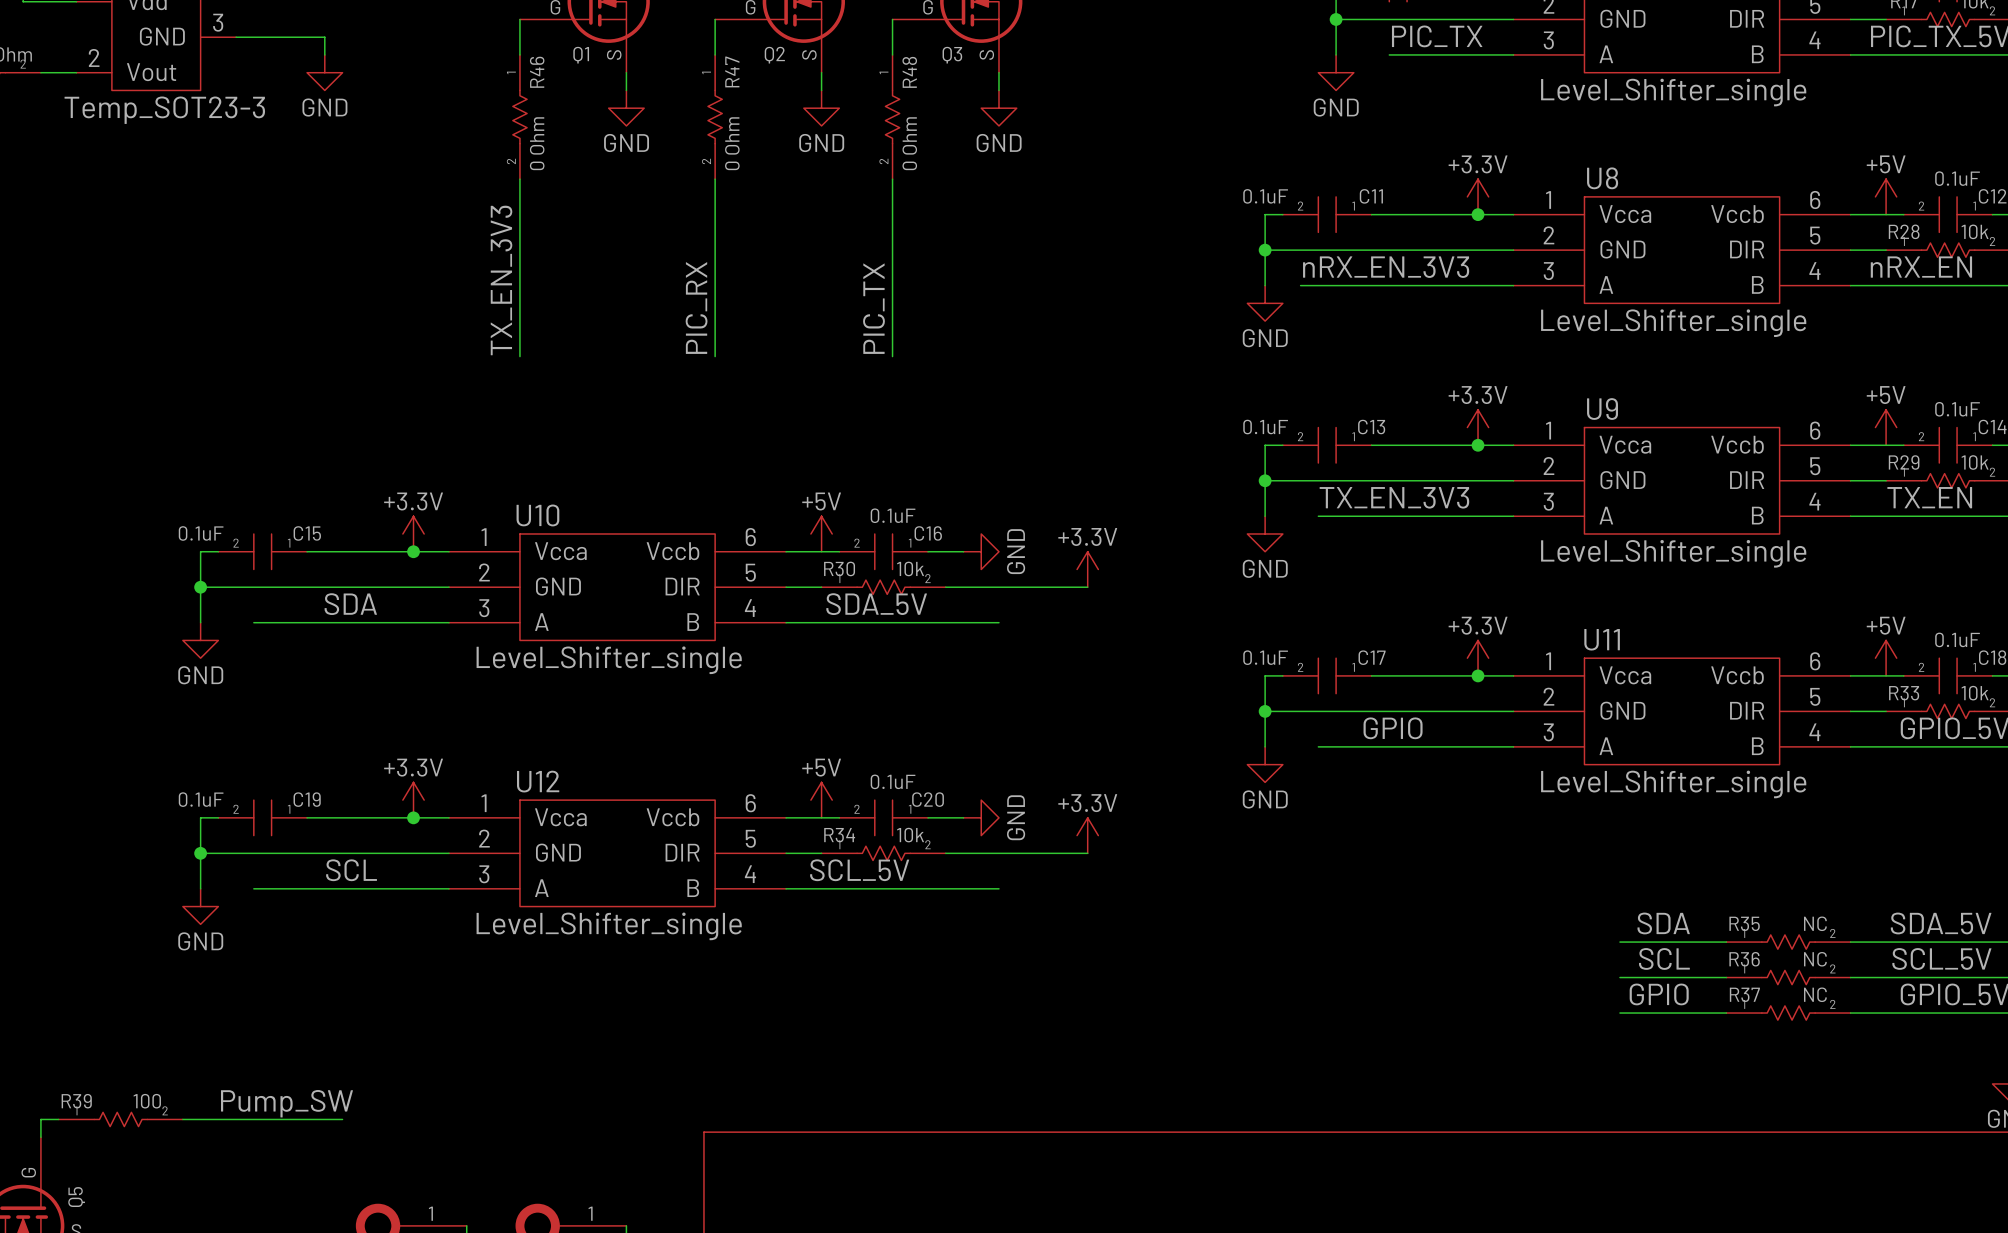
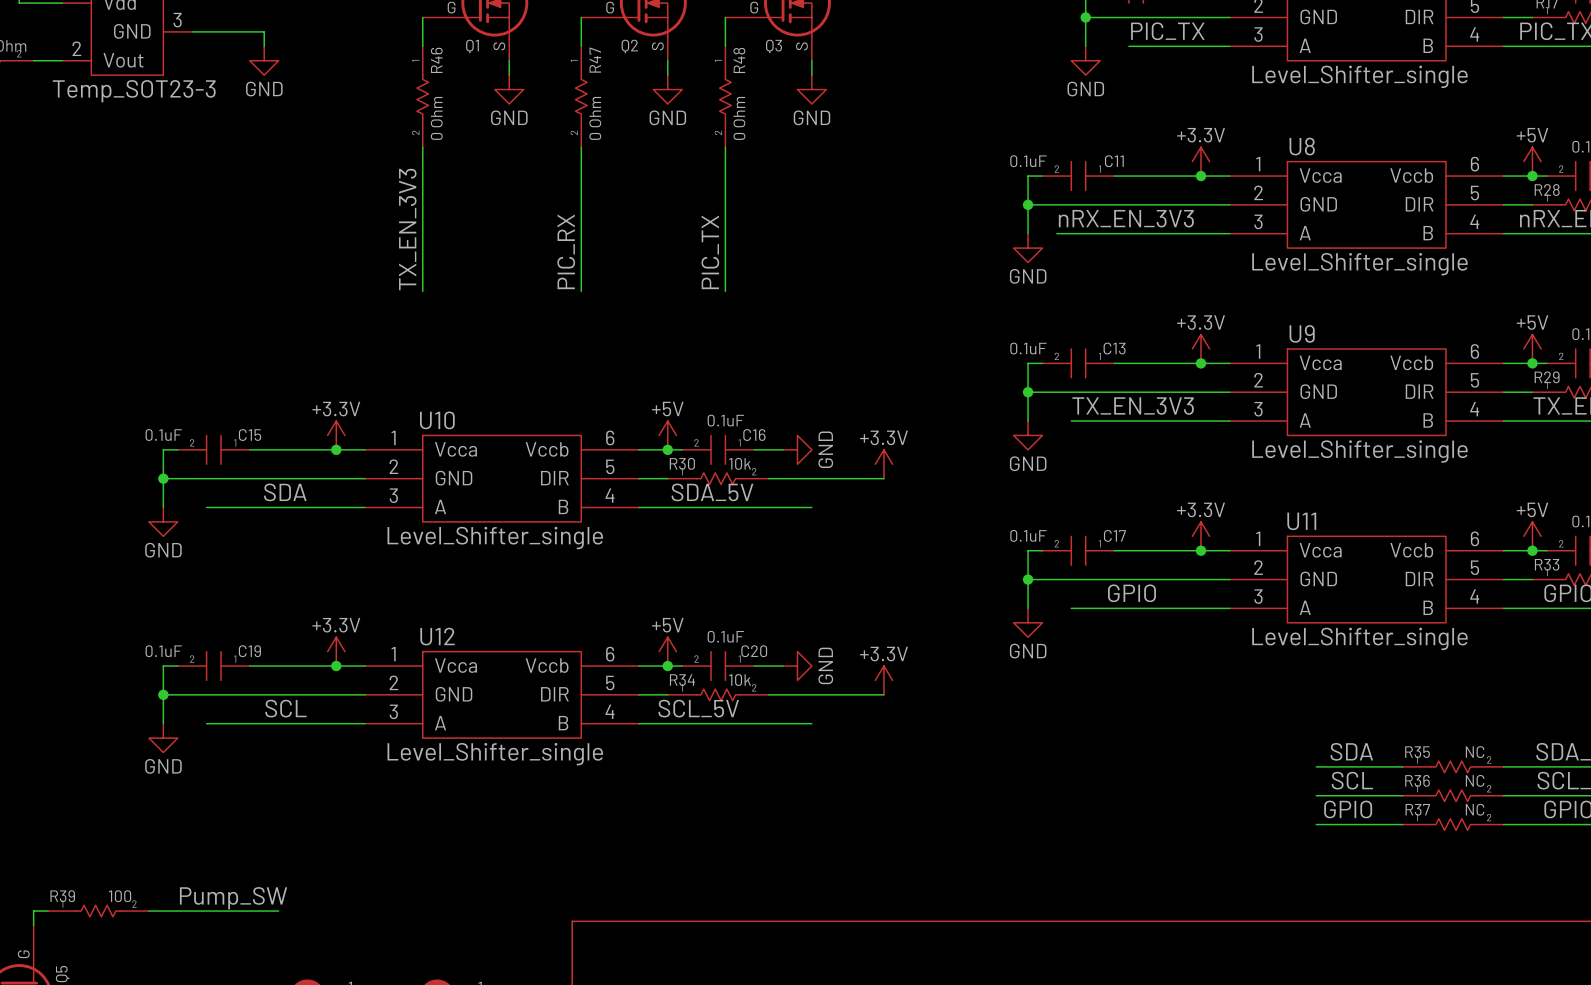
junction: none -> (1532, 176)
junction: none -> (1532, 363)
junction: none -> (667, 449)
junction: none -> (1532, 550)
junction: none -> (667, 666)

